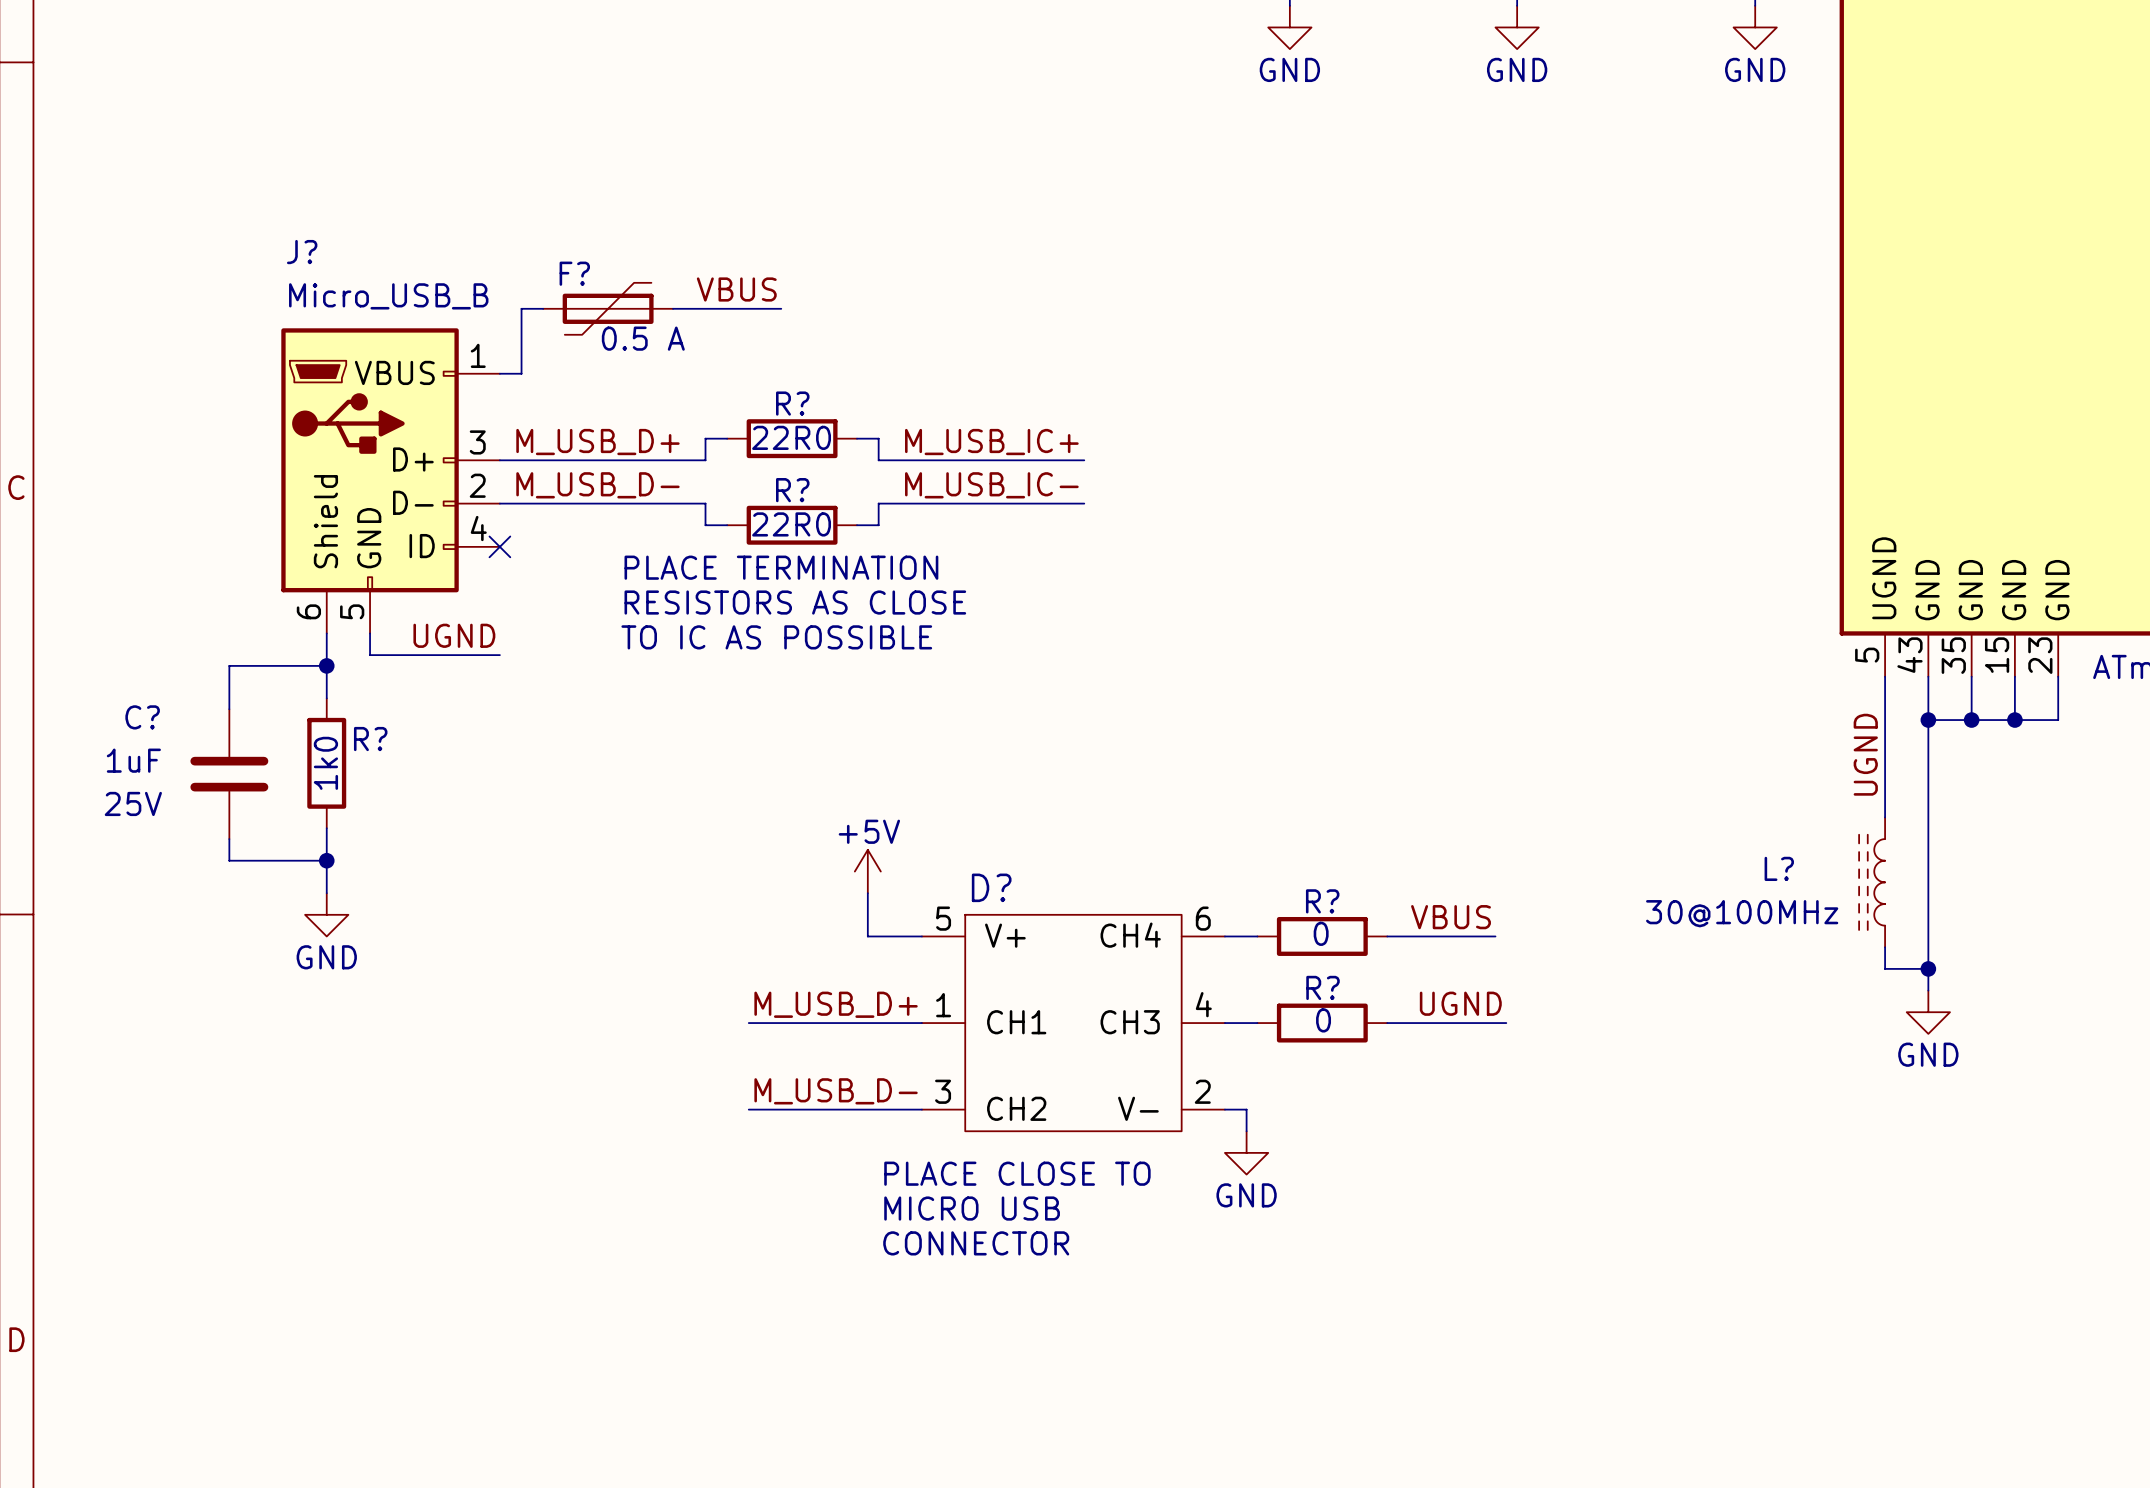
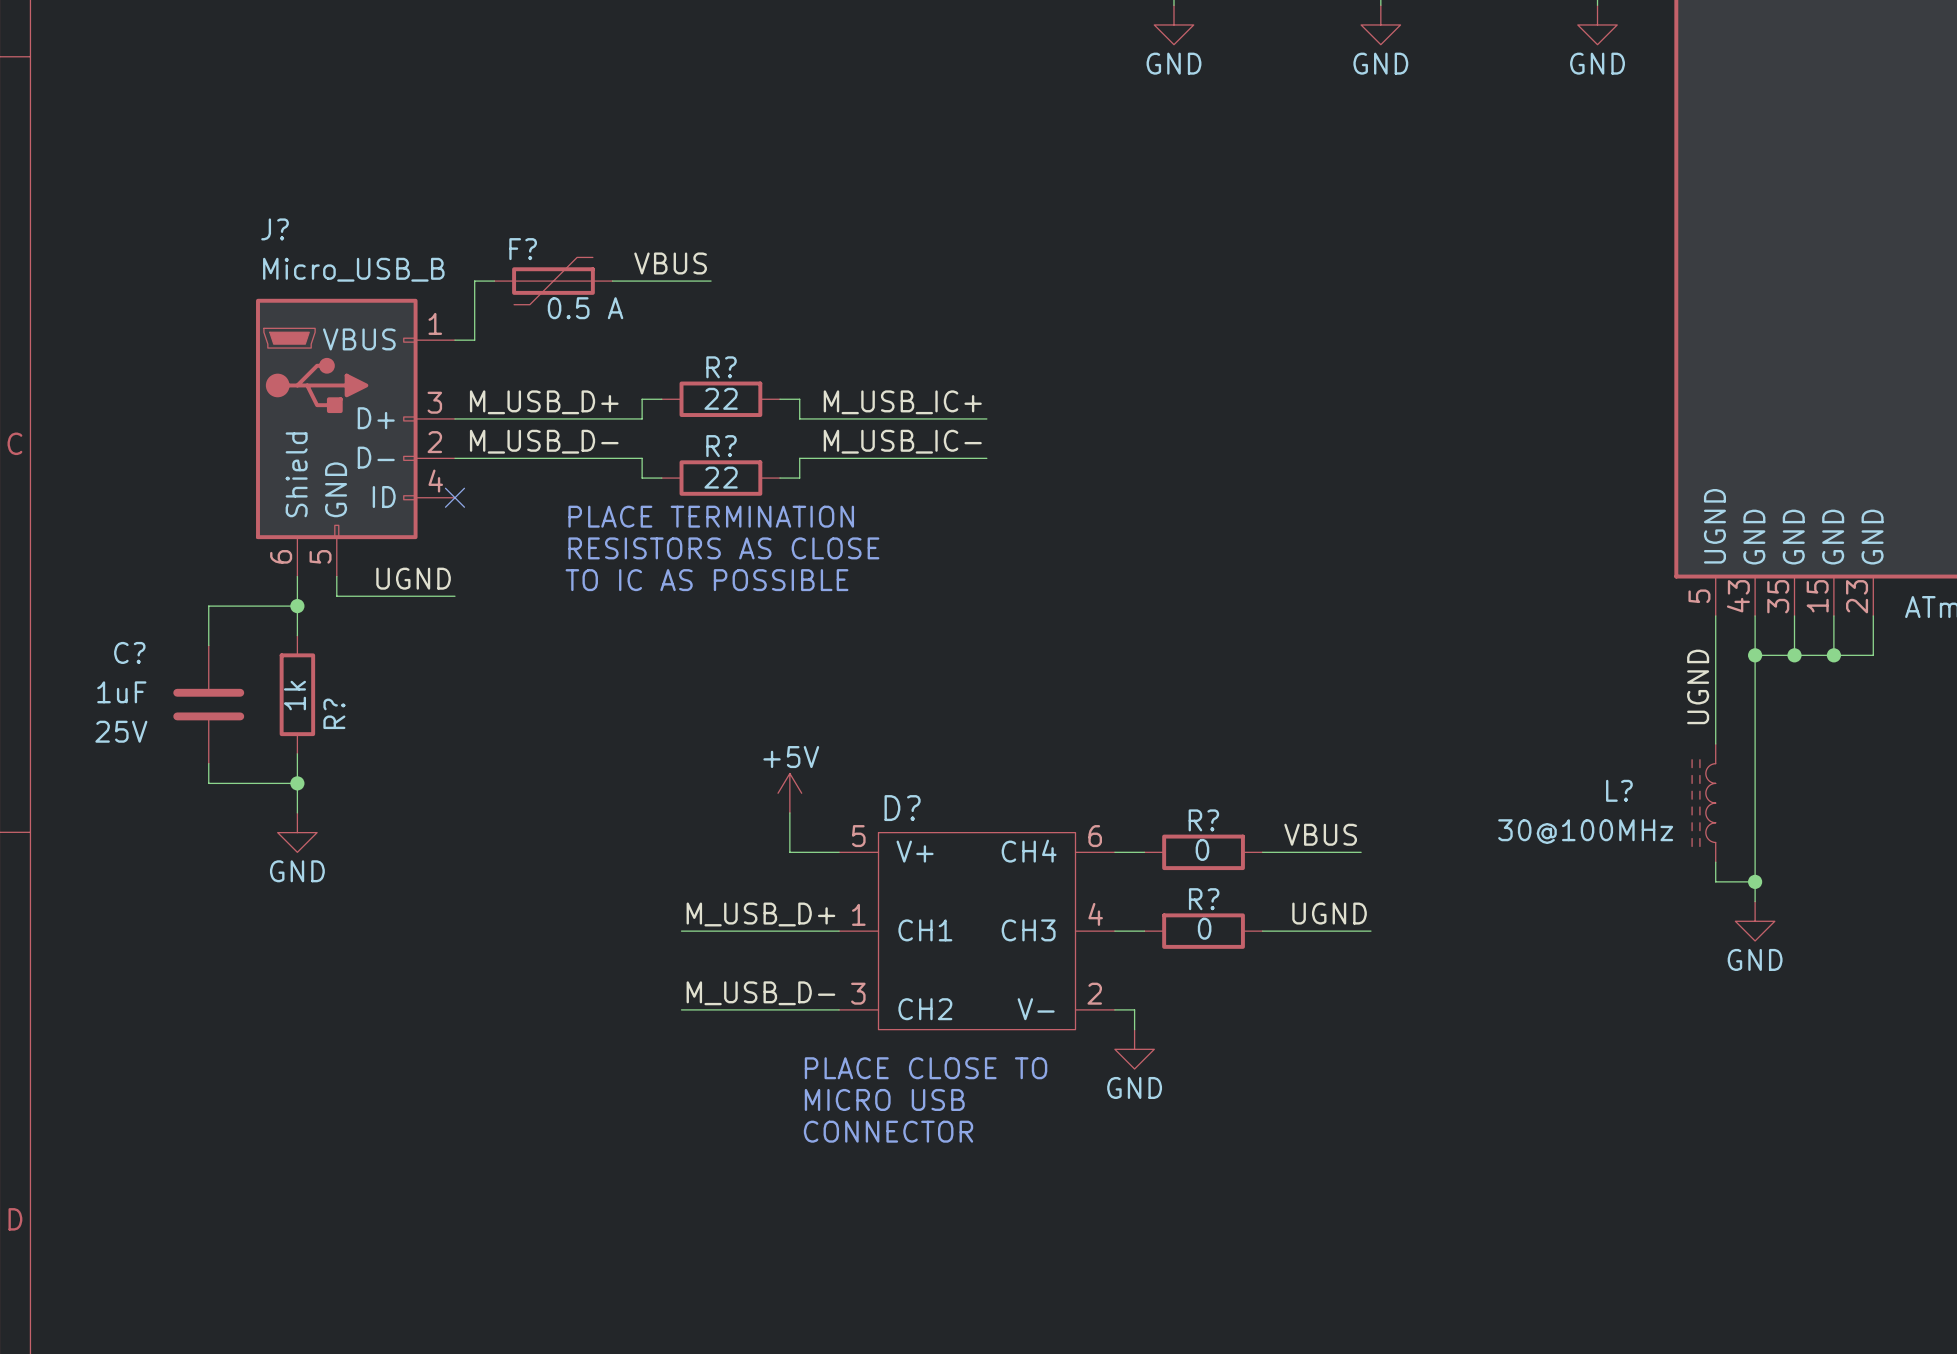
R? text: 22R0 (791, 437) -> 22 (721, 398)
R? text: 22R0 (791, 524) -> 22 (721, 477)
R? name rotation: 0° (370, 739) -> 90° counterclockwise (334, 713)
R? text: 1k0 (325, 763) -> 1k (294, 695)

